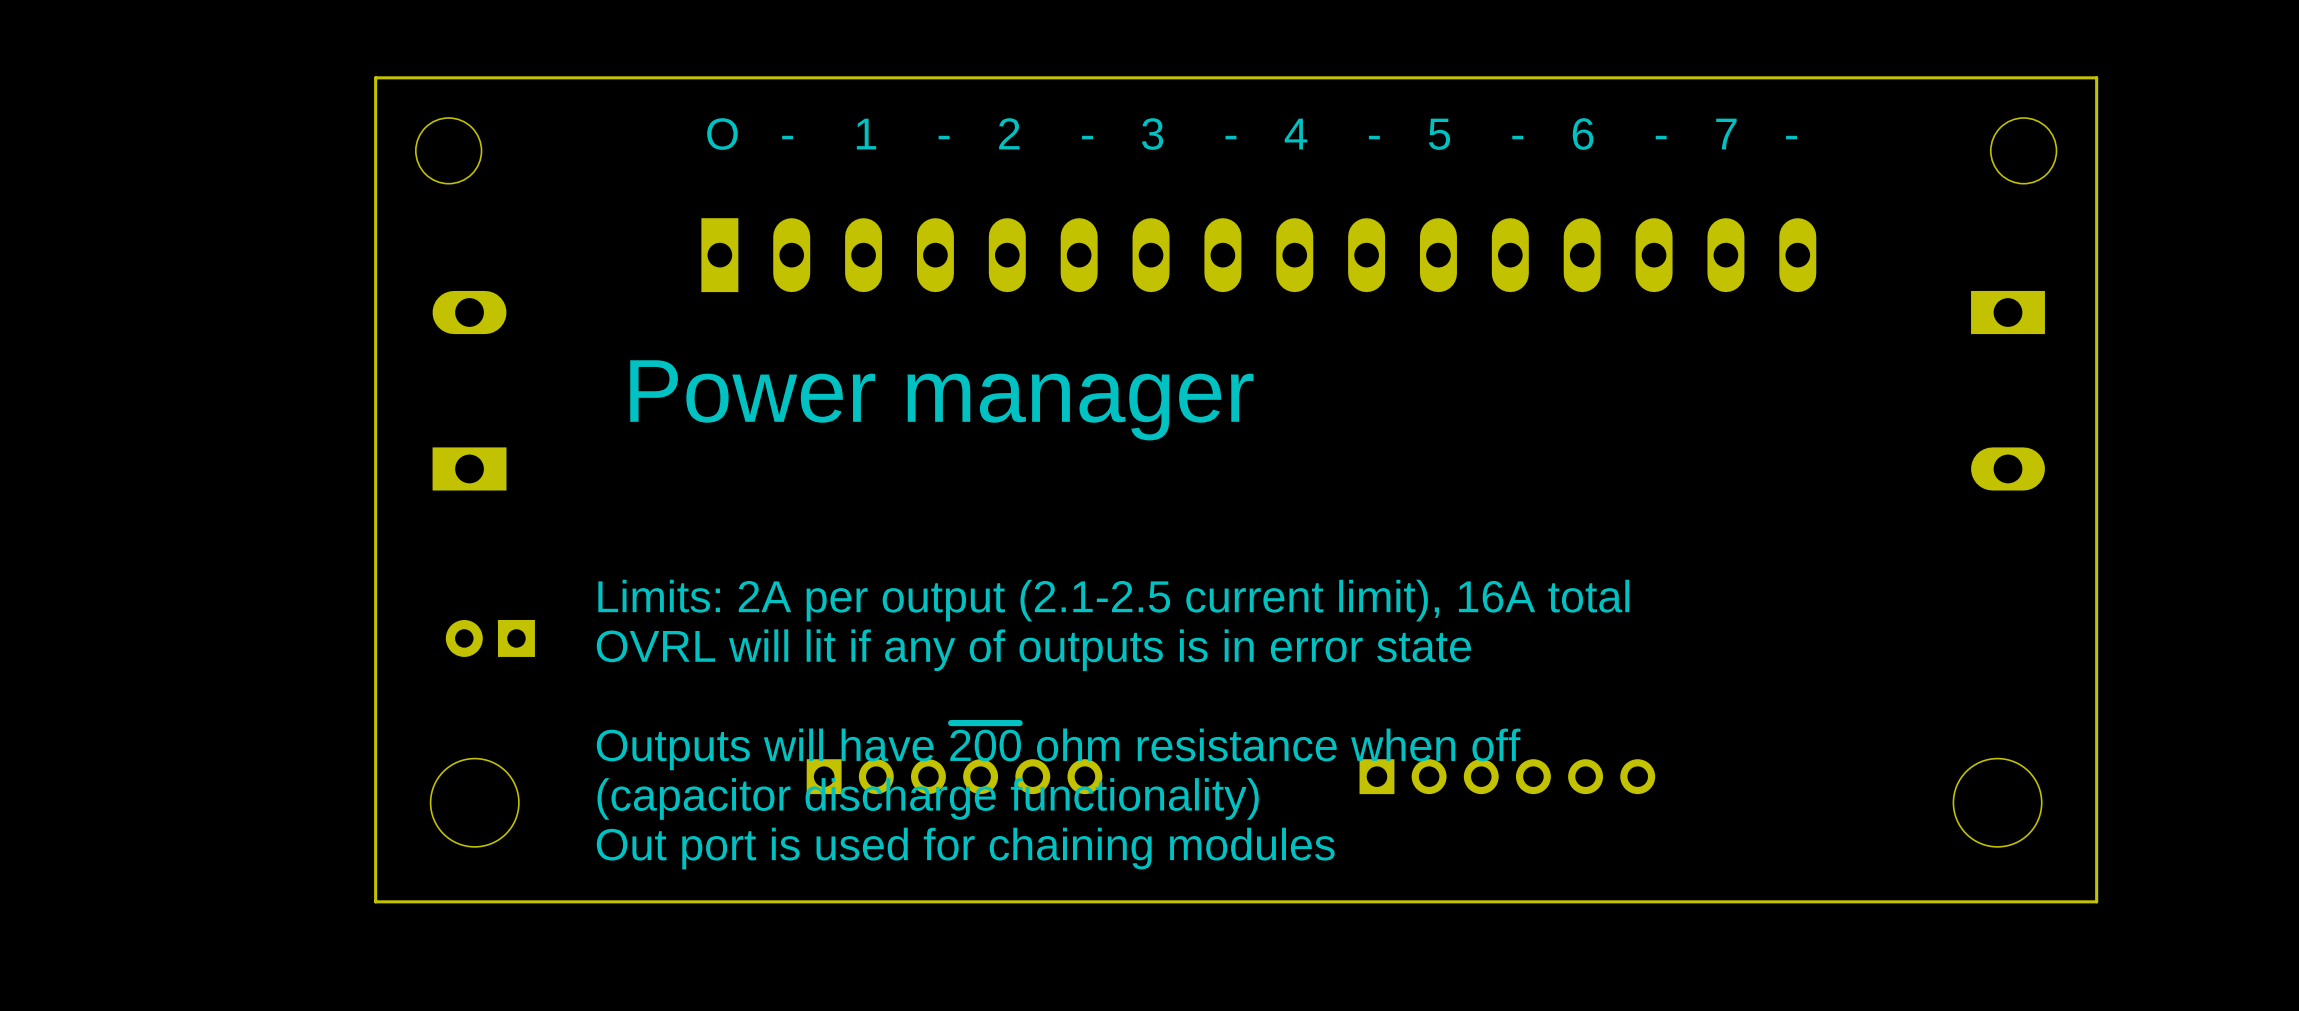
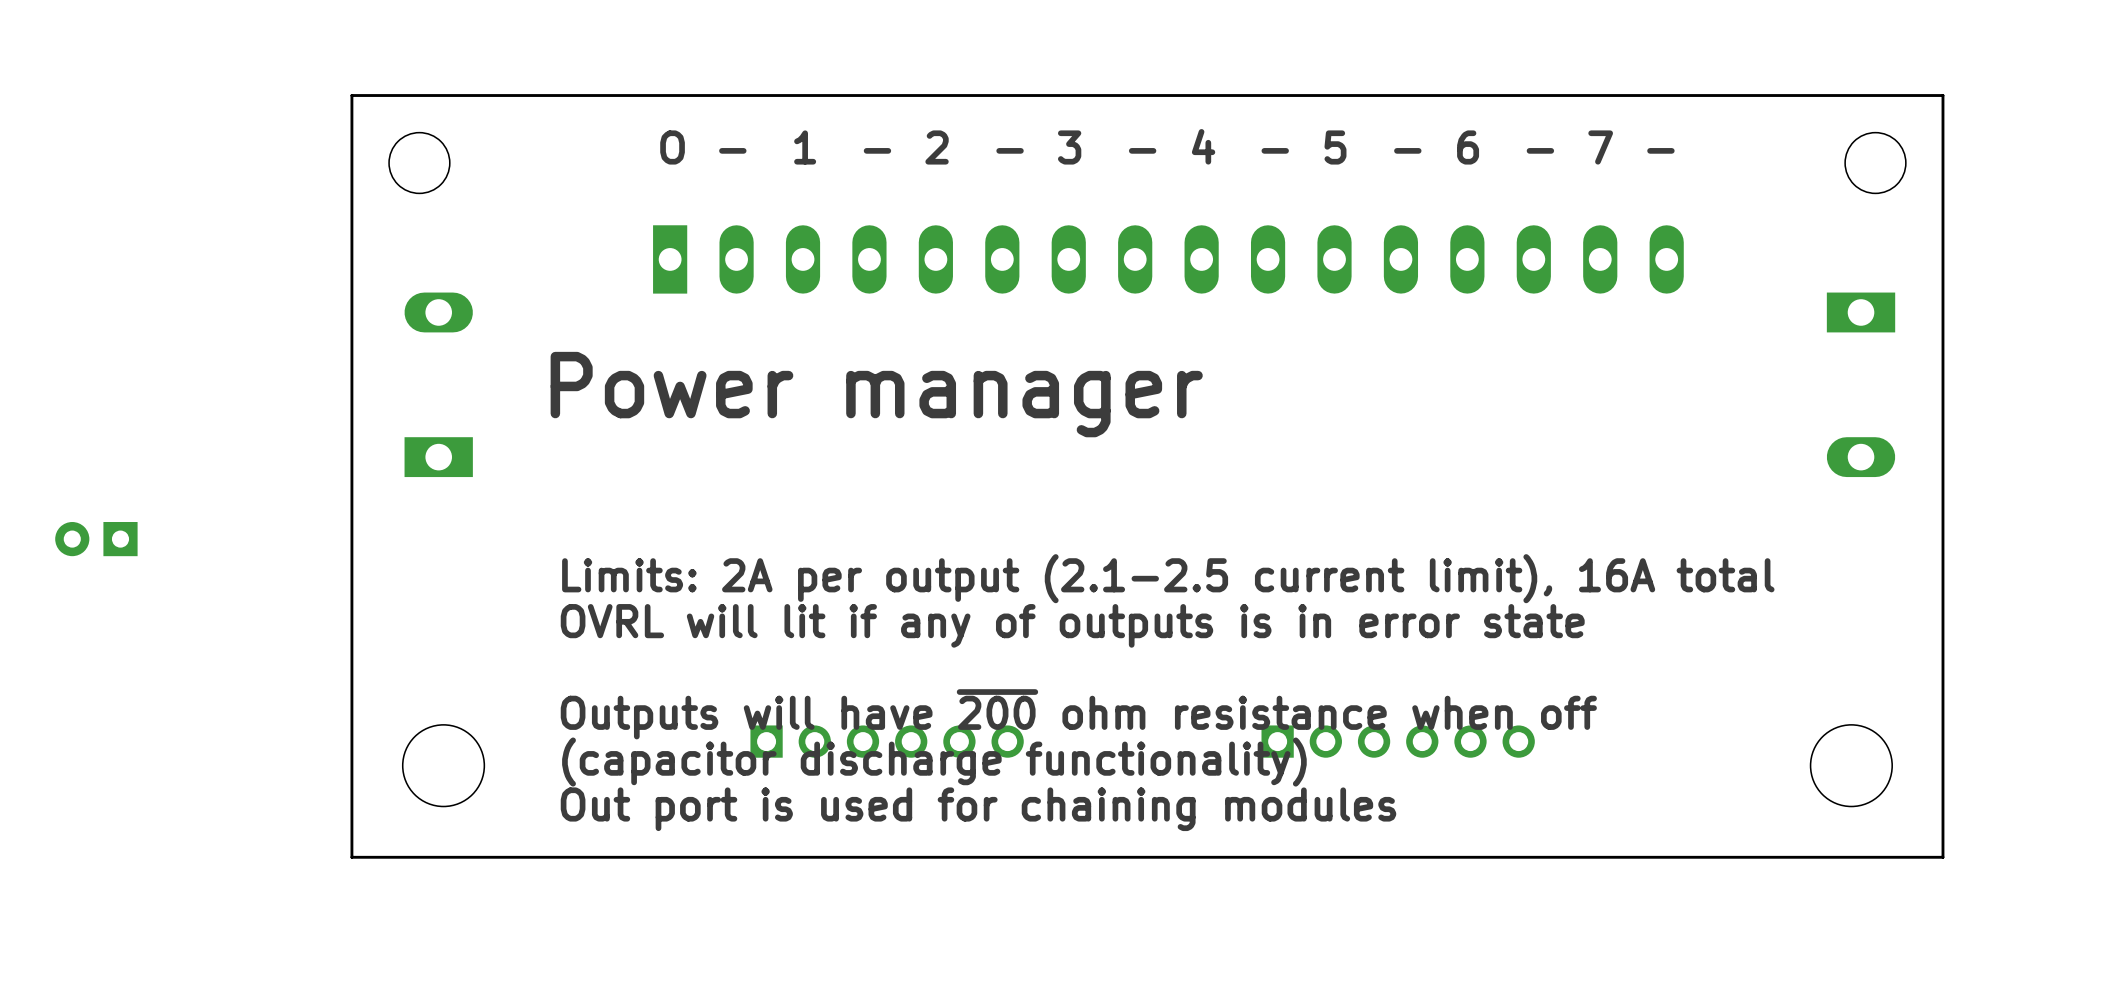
part position: (490, 638) -> (96, 539)

